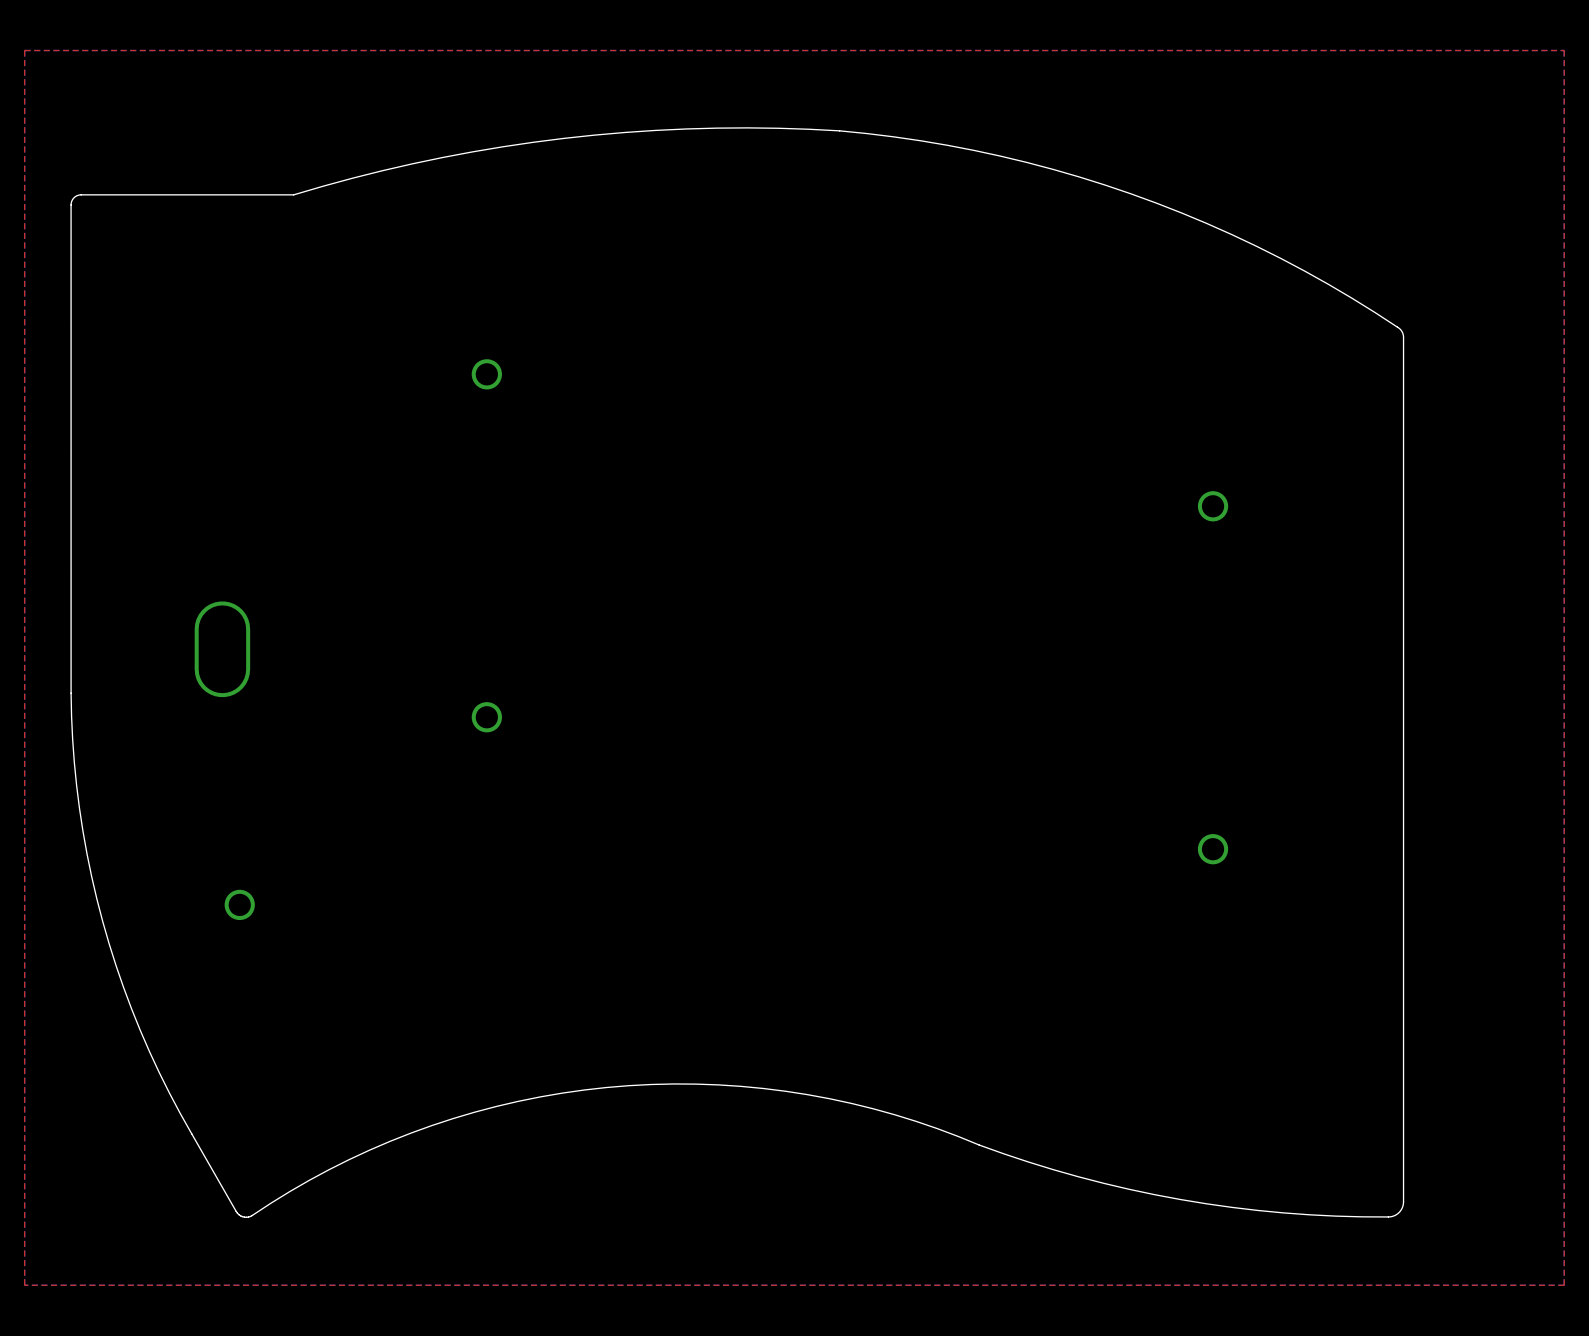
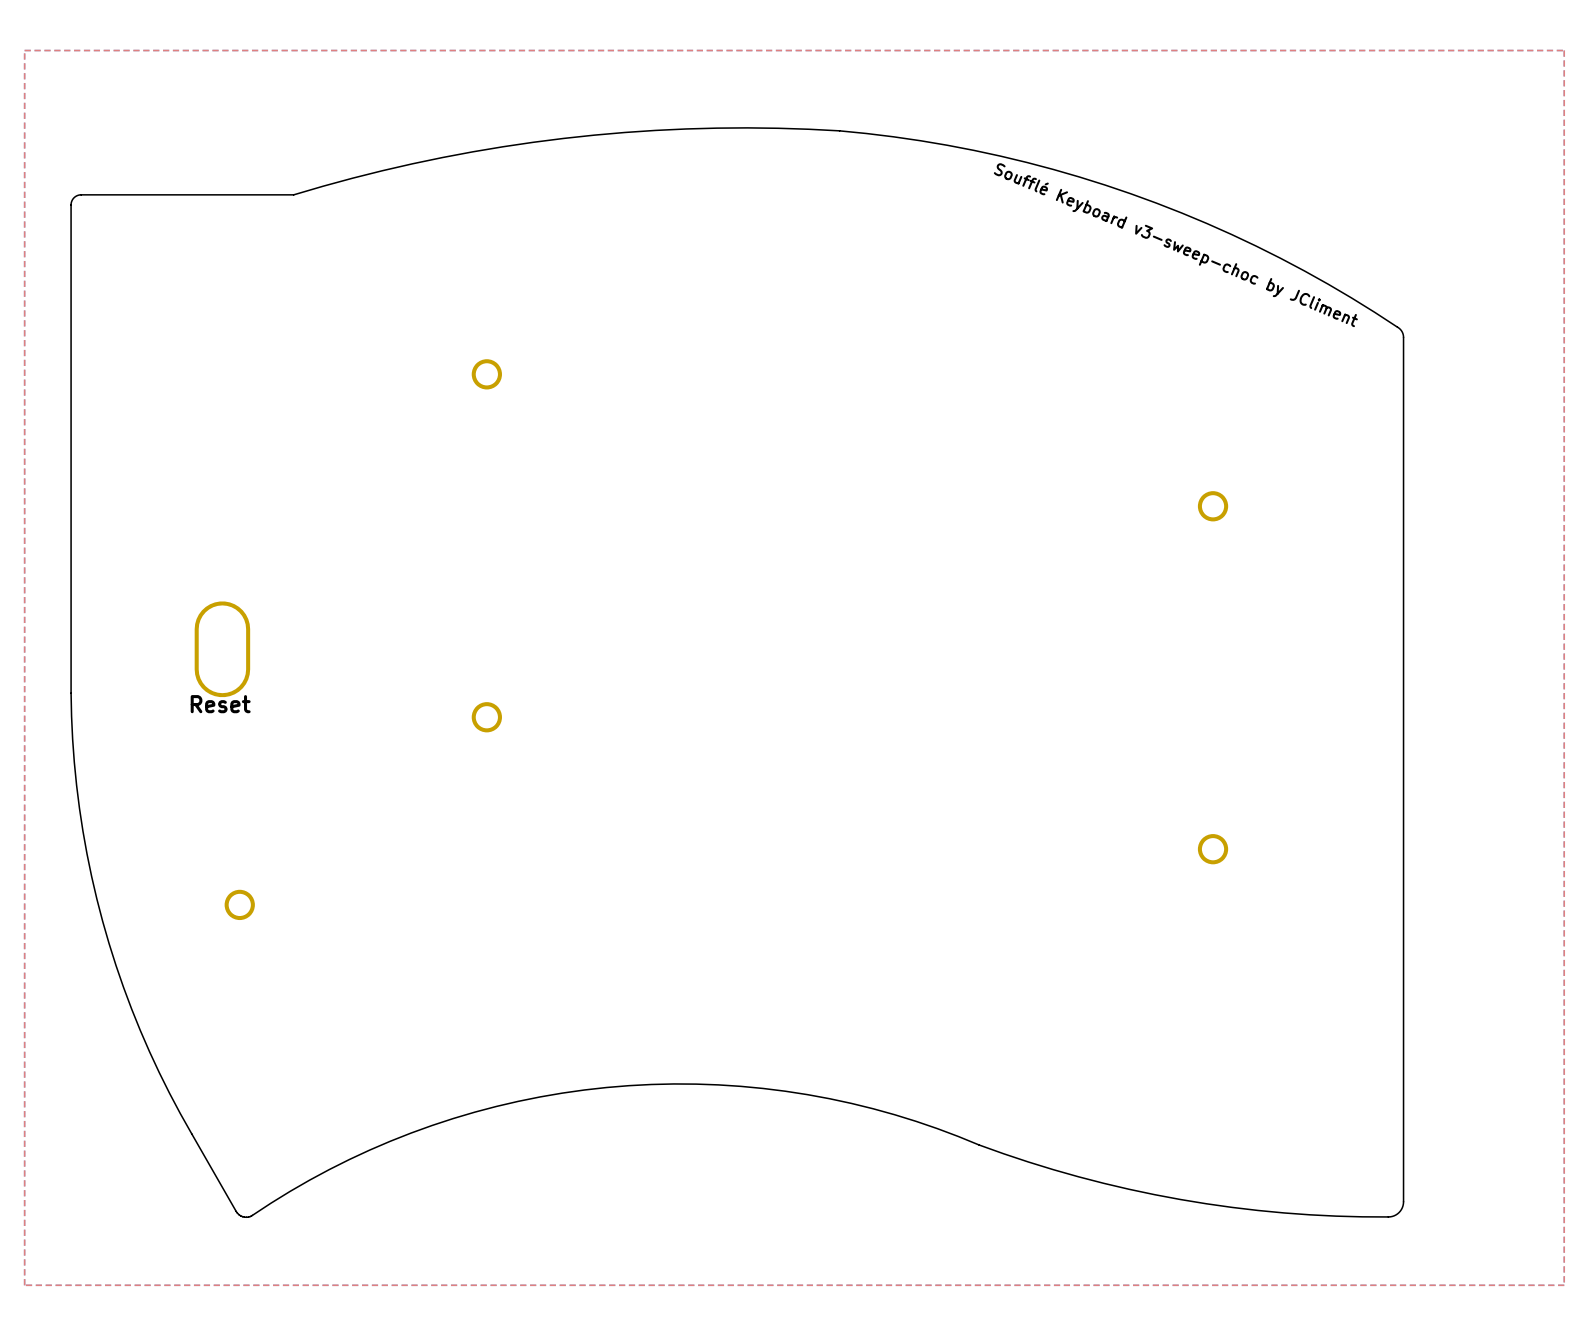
text: none -> Soufflé Keyboard v3-sweep-choc by JCliment (1175, 245)
text: none -> Reset (220, 704)

